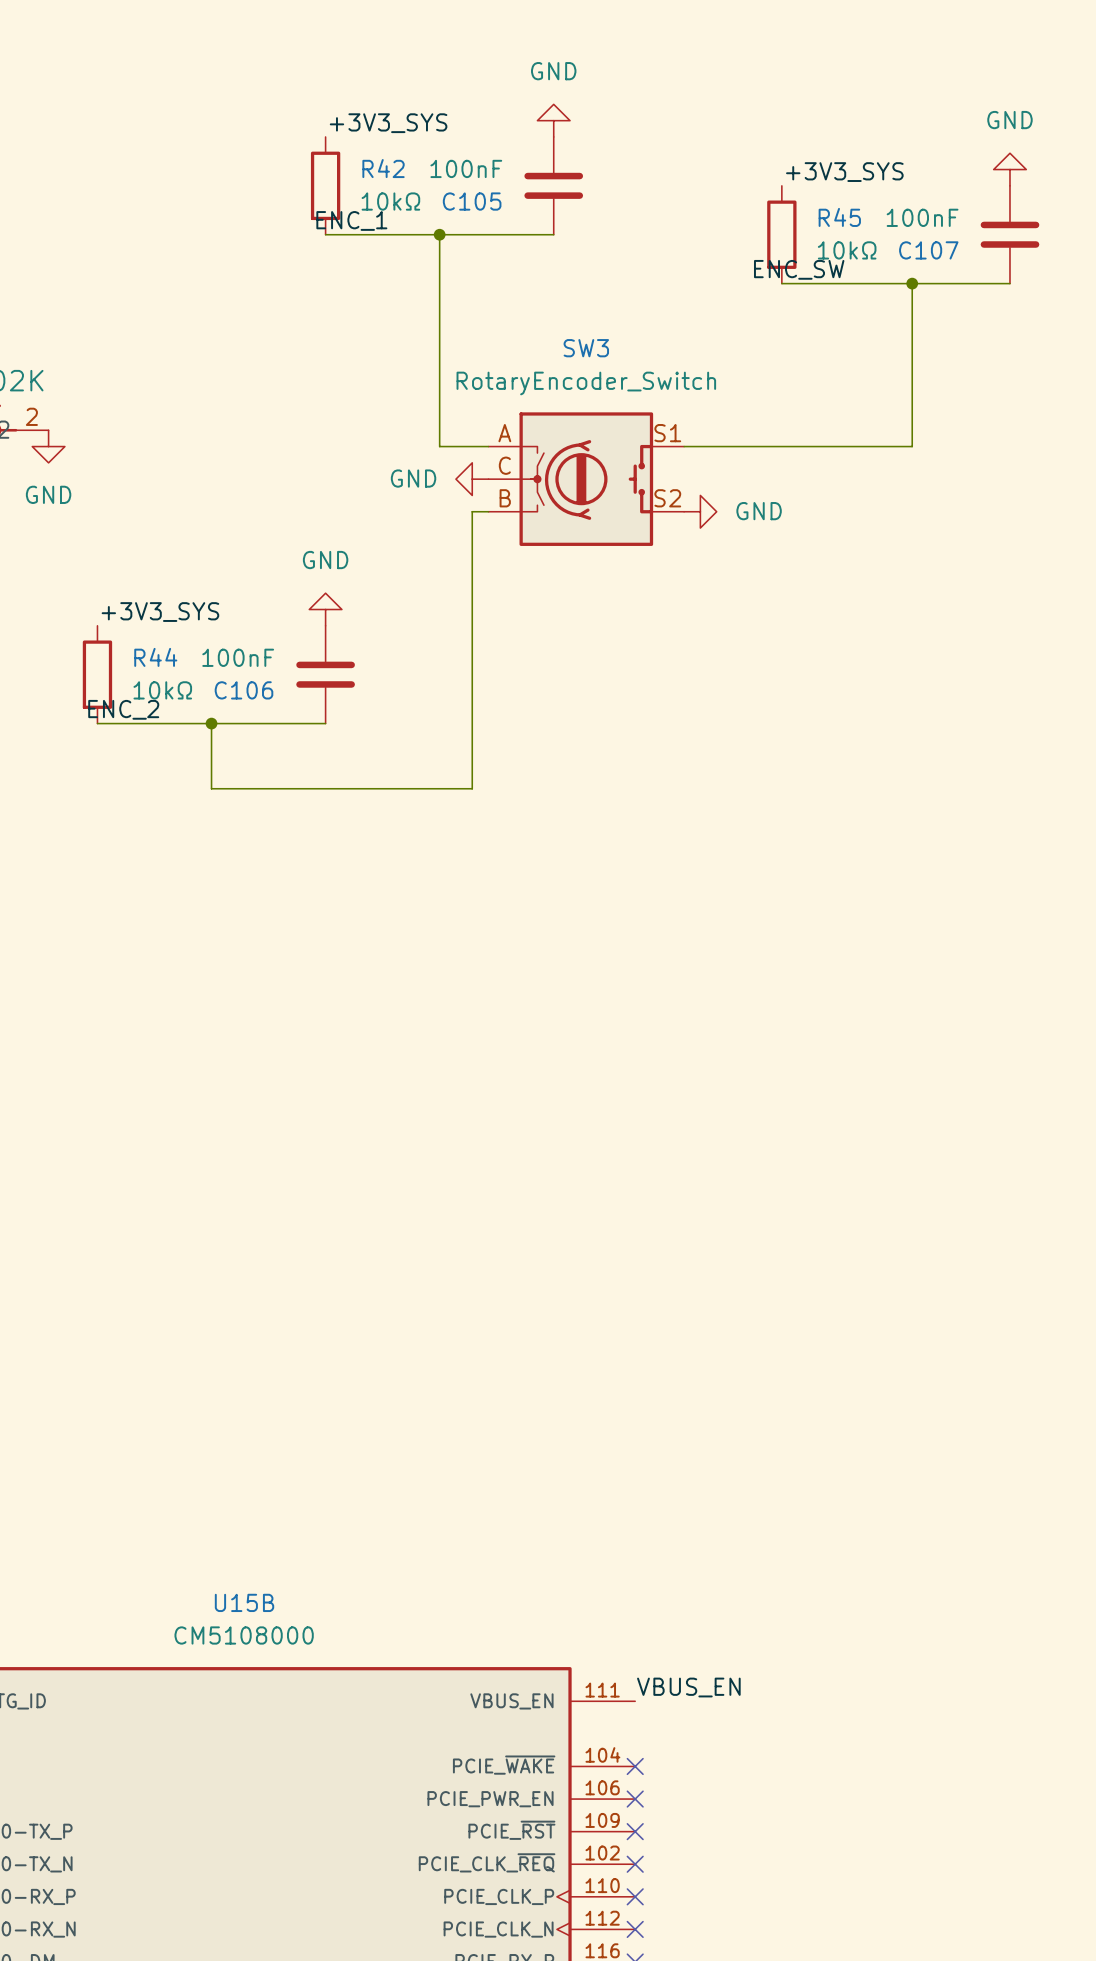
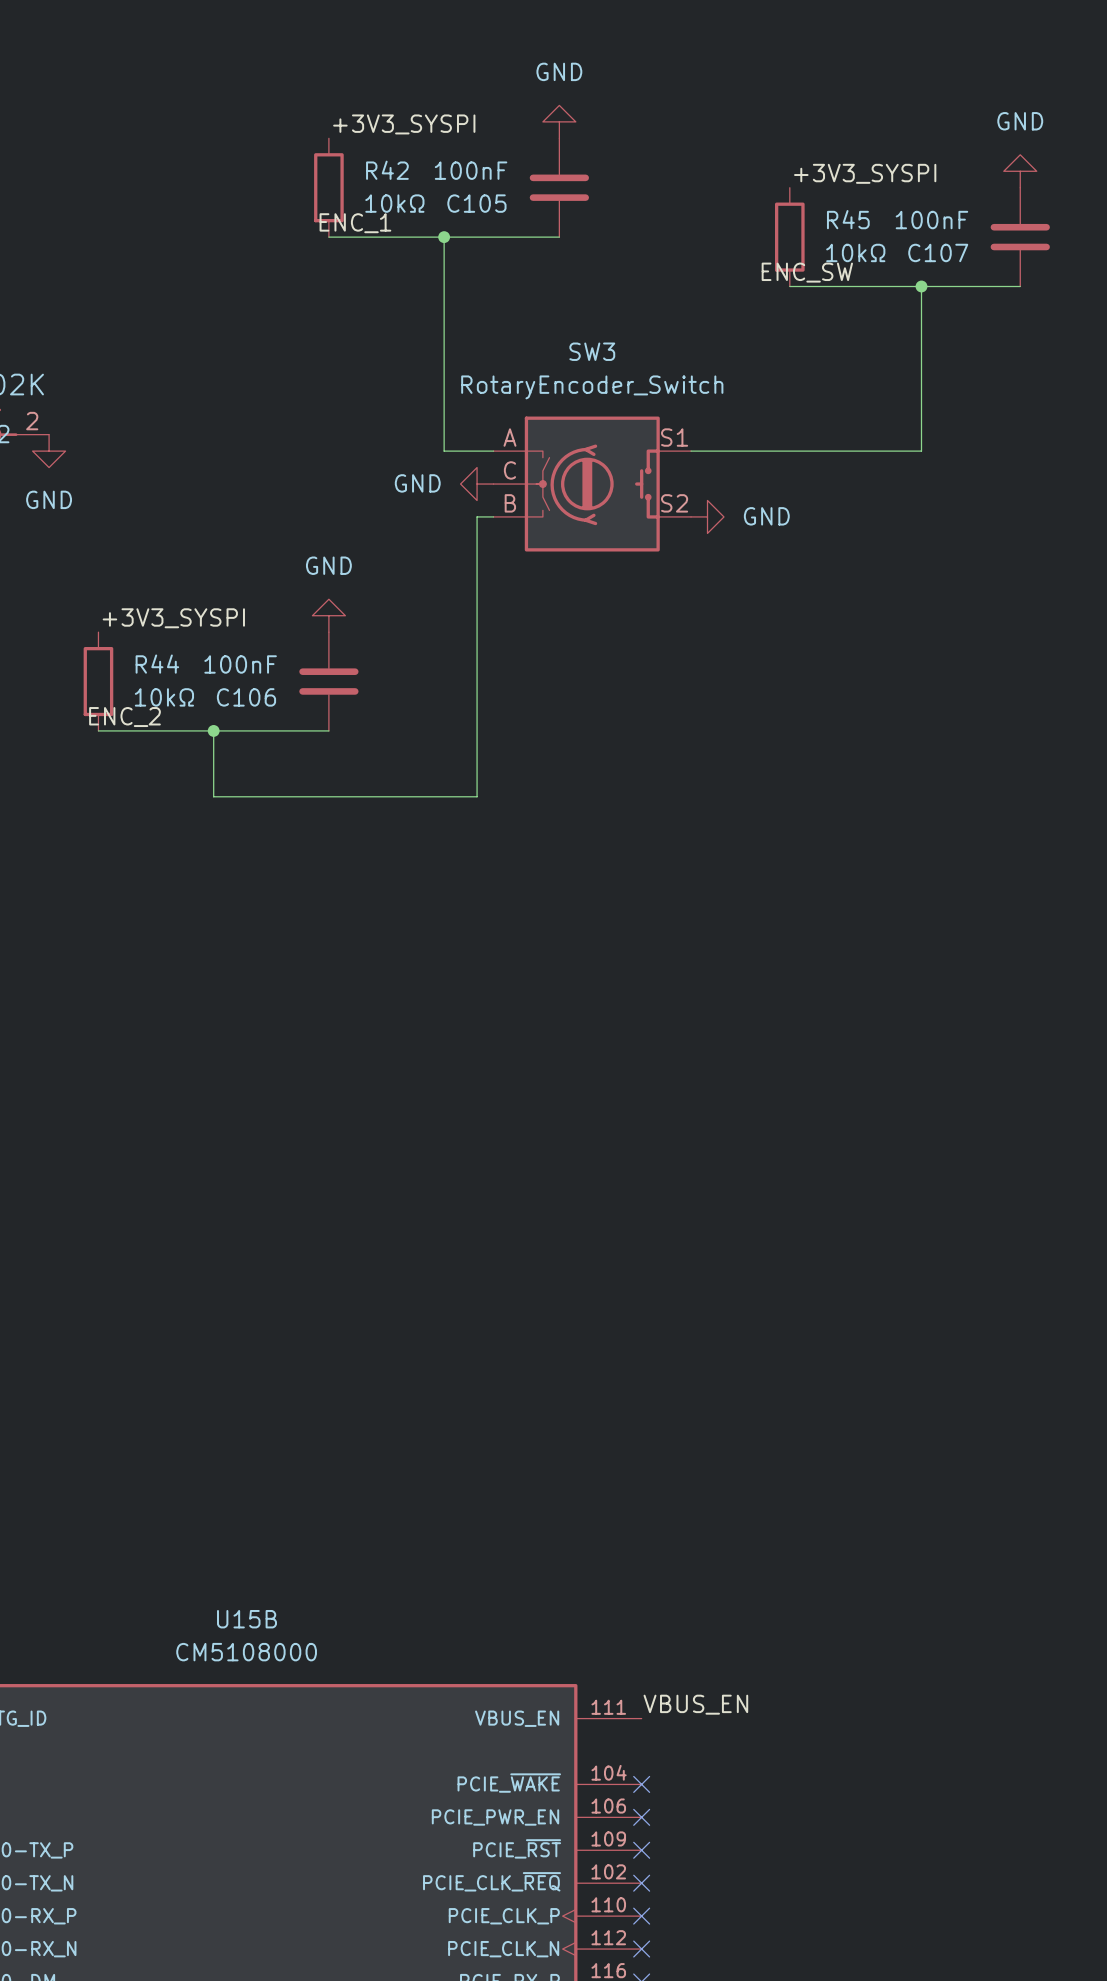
label: +3V3_SYS (388, 123) -> +3V3_SYSPI (404, 124)
label: +3V3_SYS (844, 172) -> +3V3_SYSPI (865, 173)
label: +3V3_SYS (160, 612) -> +3V3_SYSPI (173, 618)

